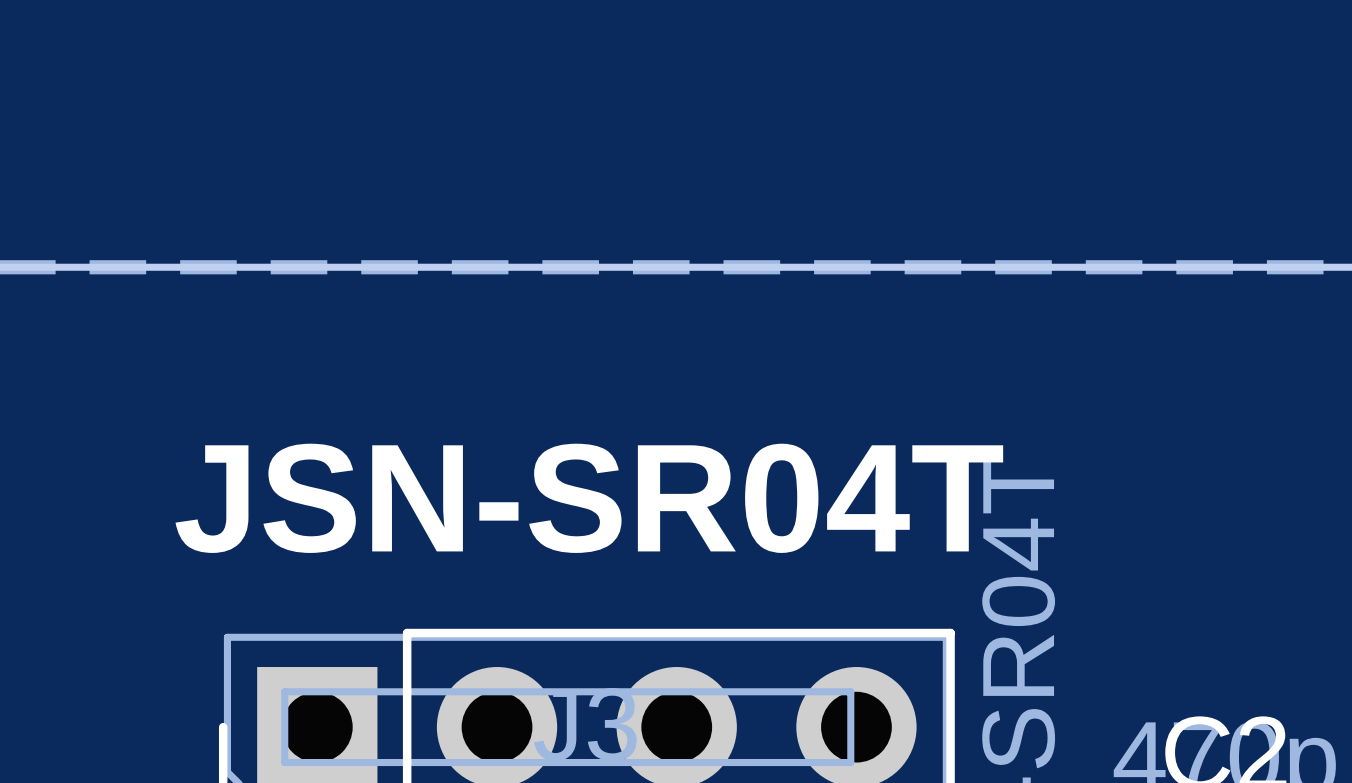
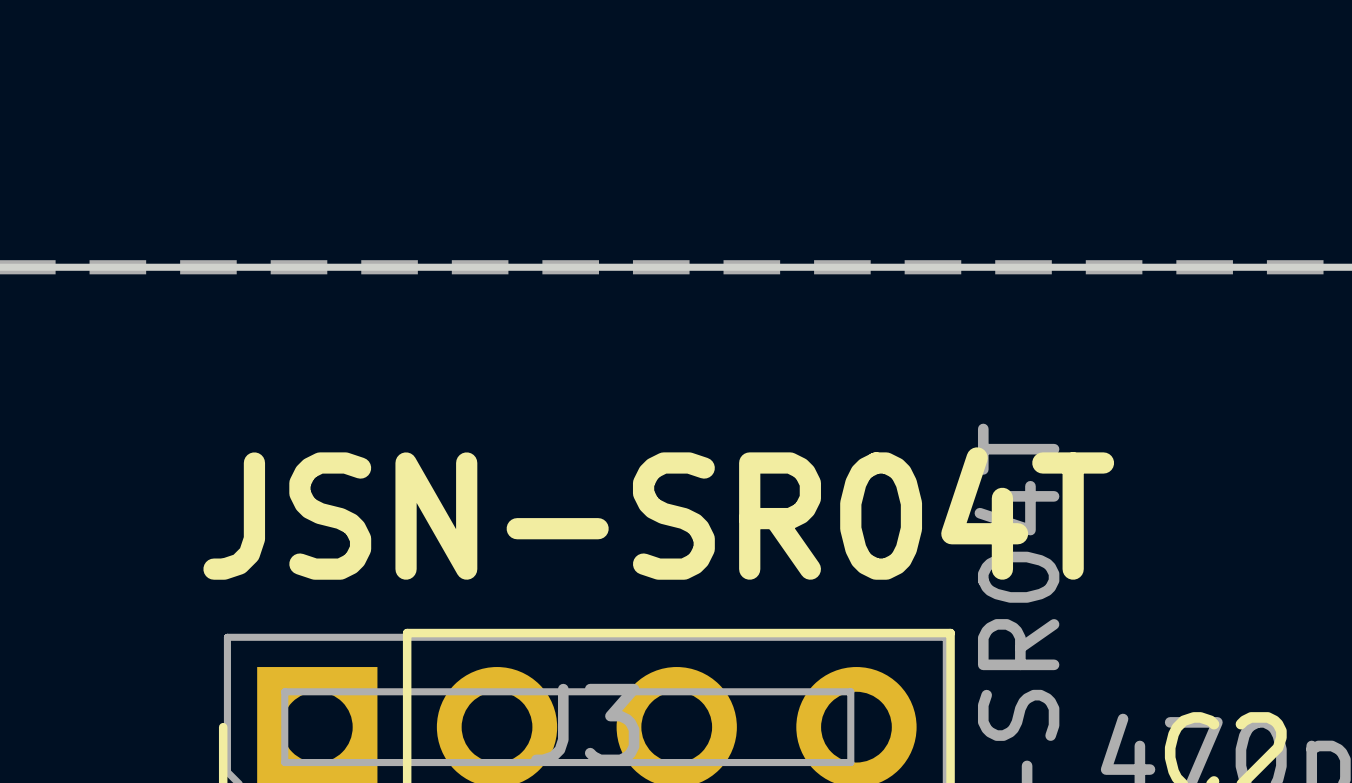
text position: JSN-SR04T (589, 498) -> JSN-SR04T (658, 513)

